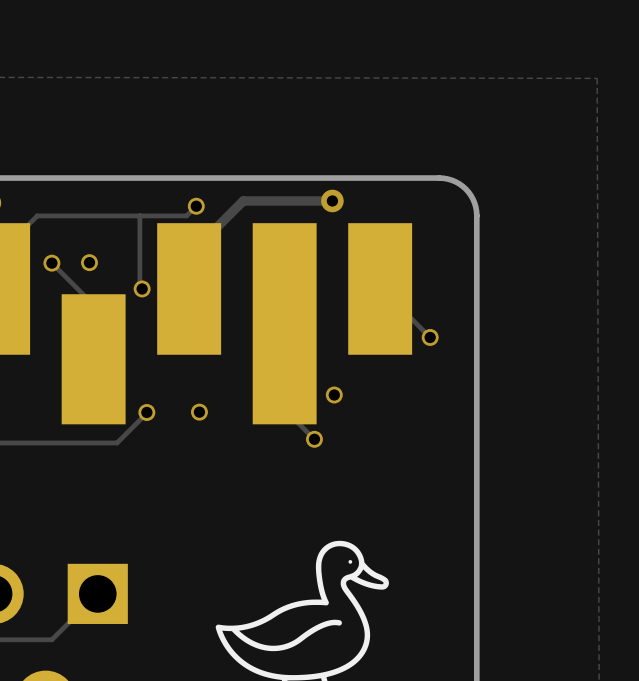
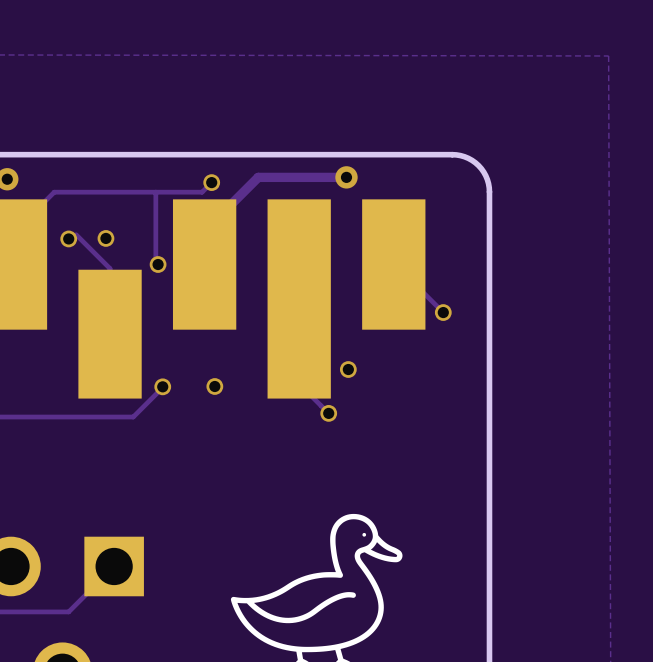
track: none -> (76, 234) (110, 268) (110, 301)
track: (51, 263) (93, 304) -> none

